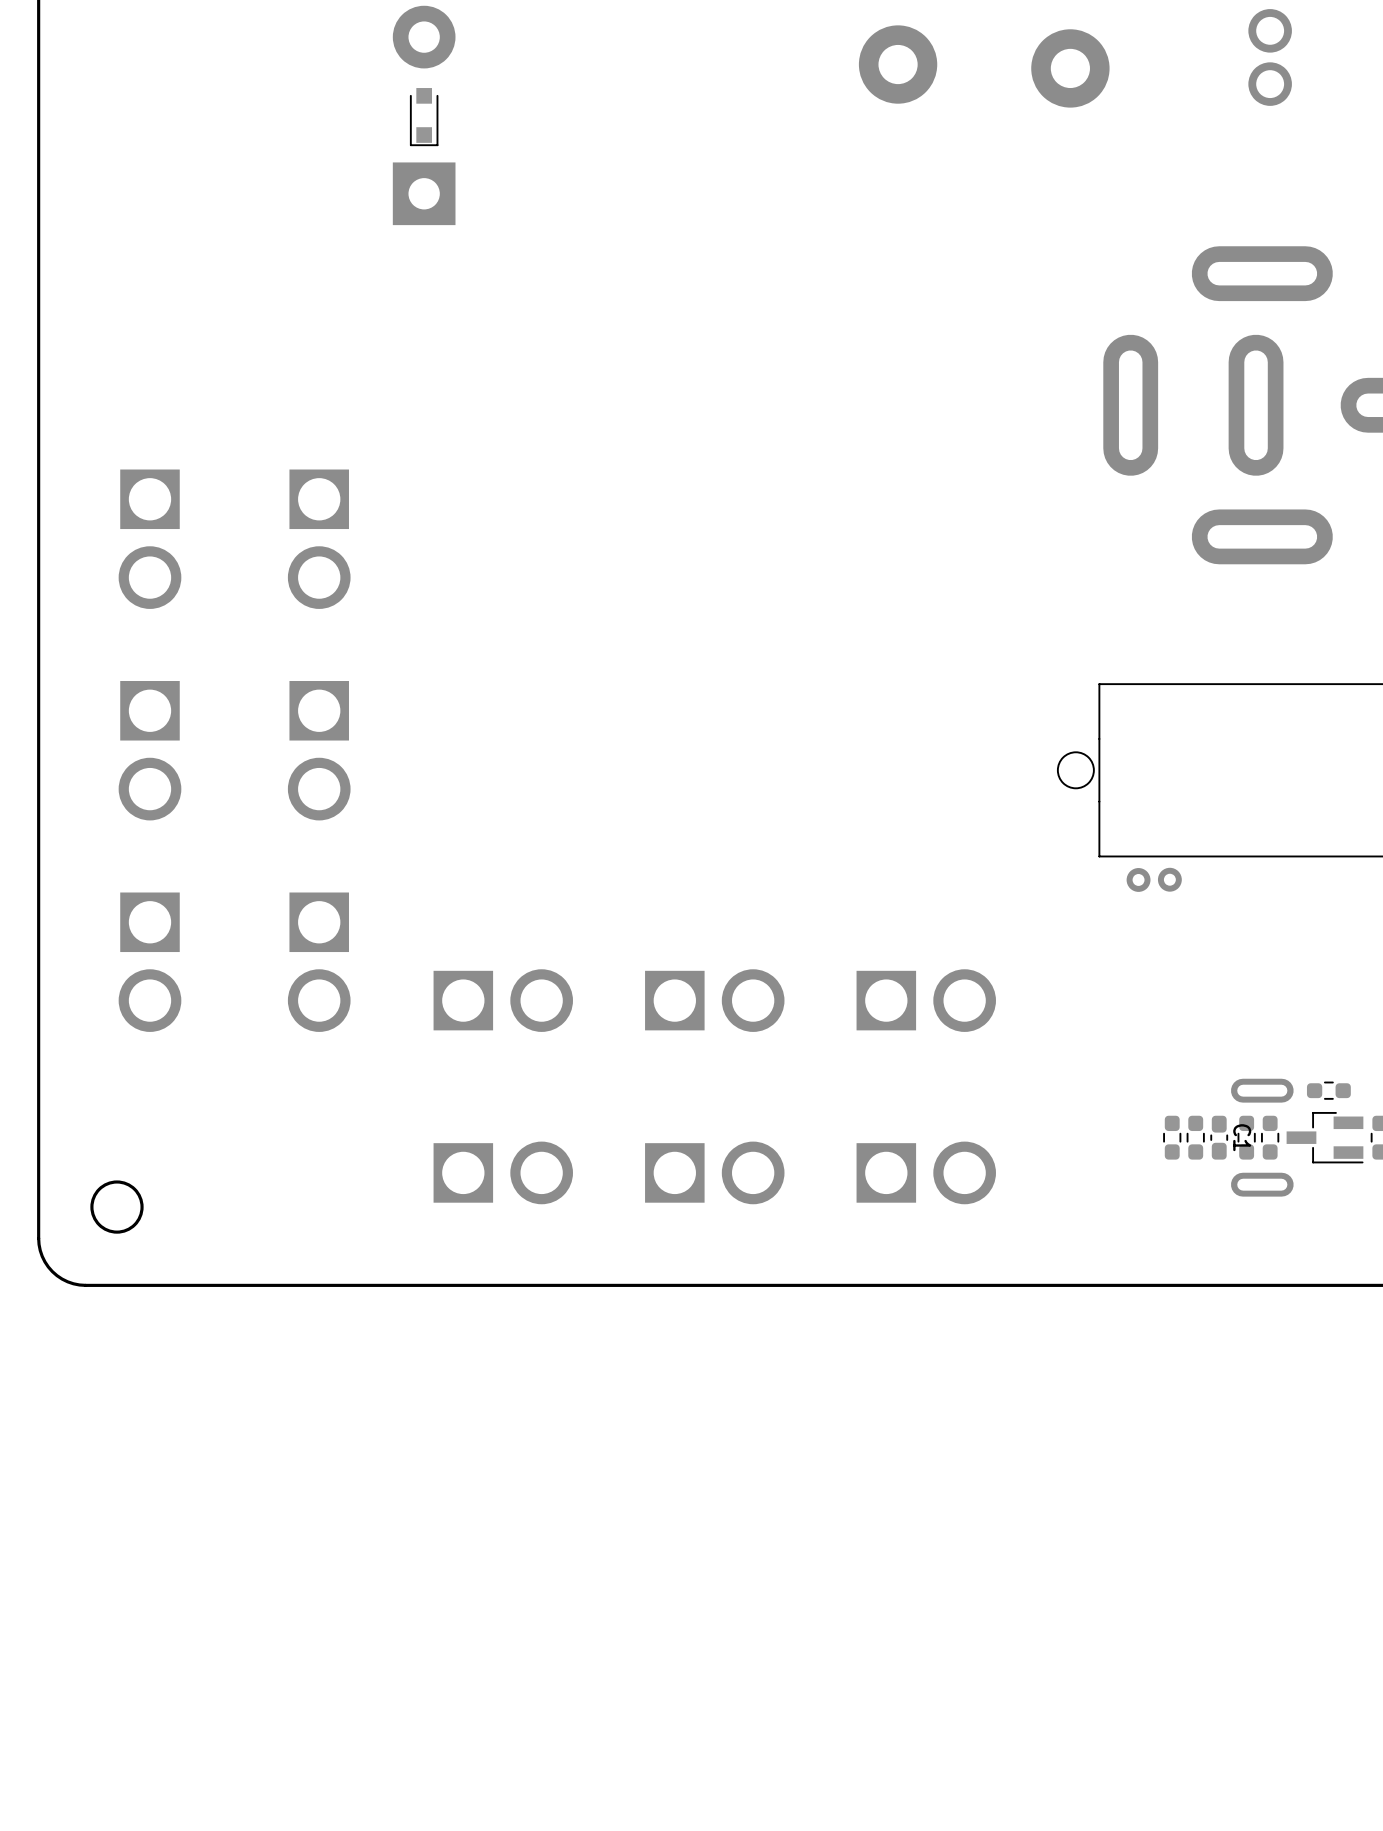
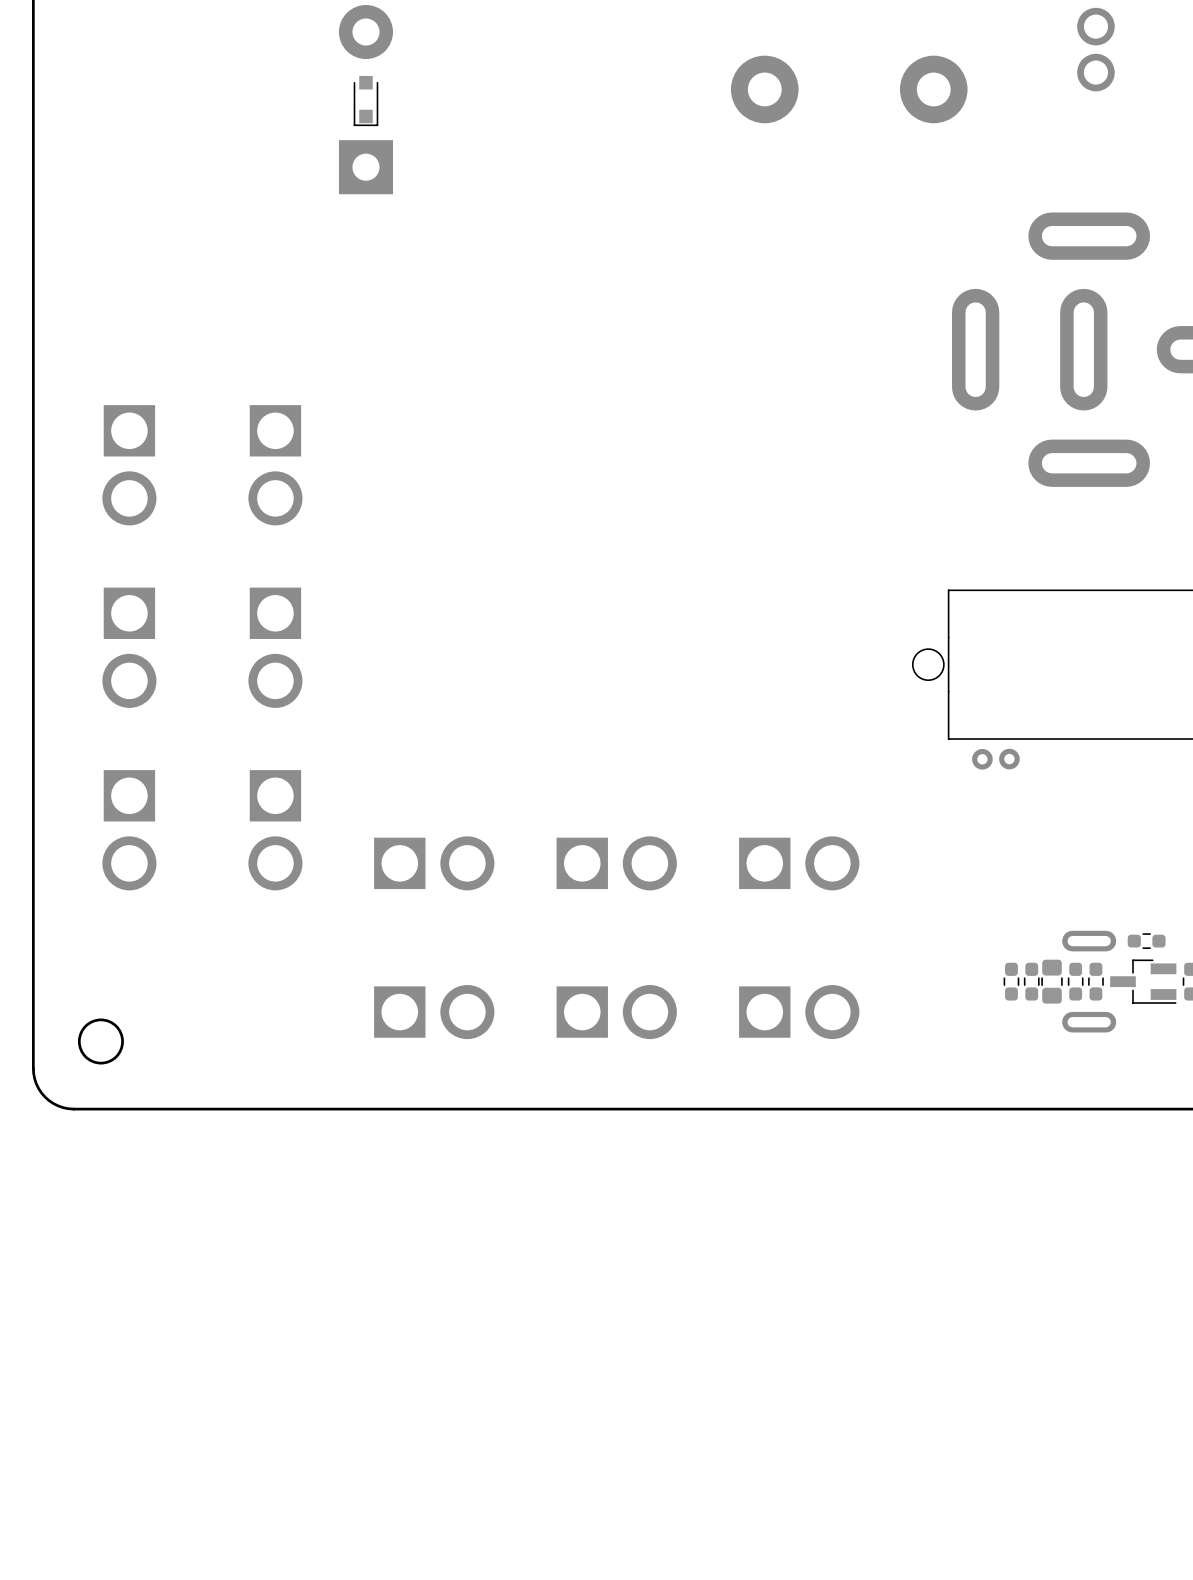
part position: (898, 64) -> (764, 89)
part position: (1070, 68) -> (933, 89)
C1: (1219, 1137) -> none
part: none -> (1052, 981)

